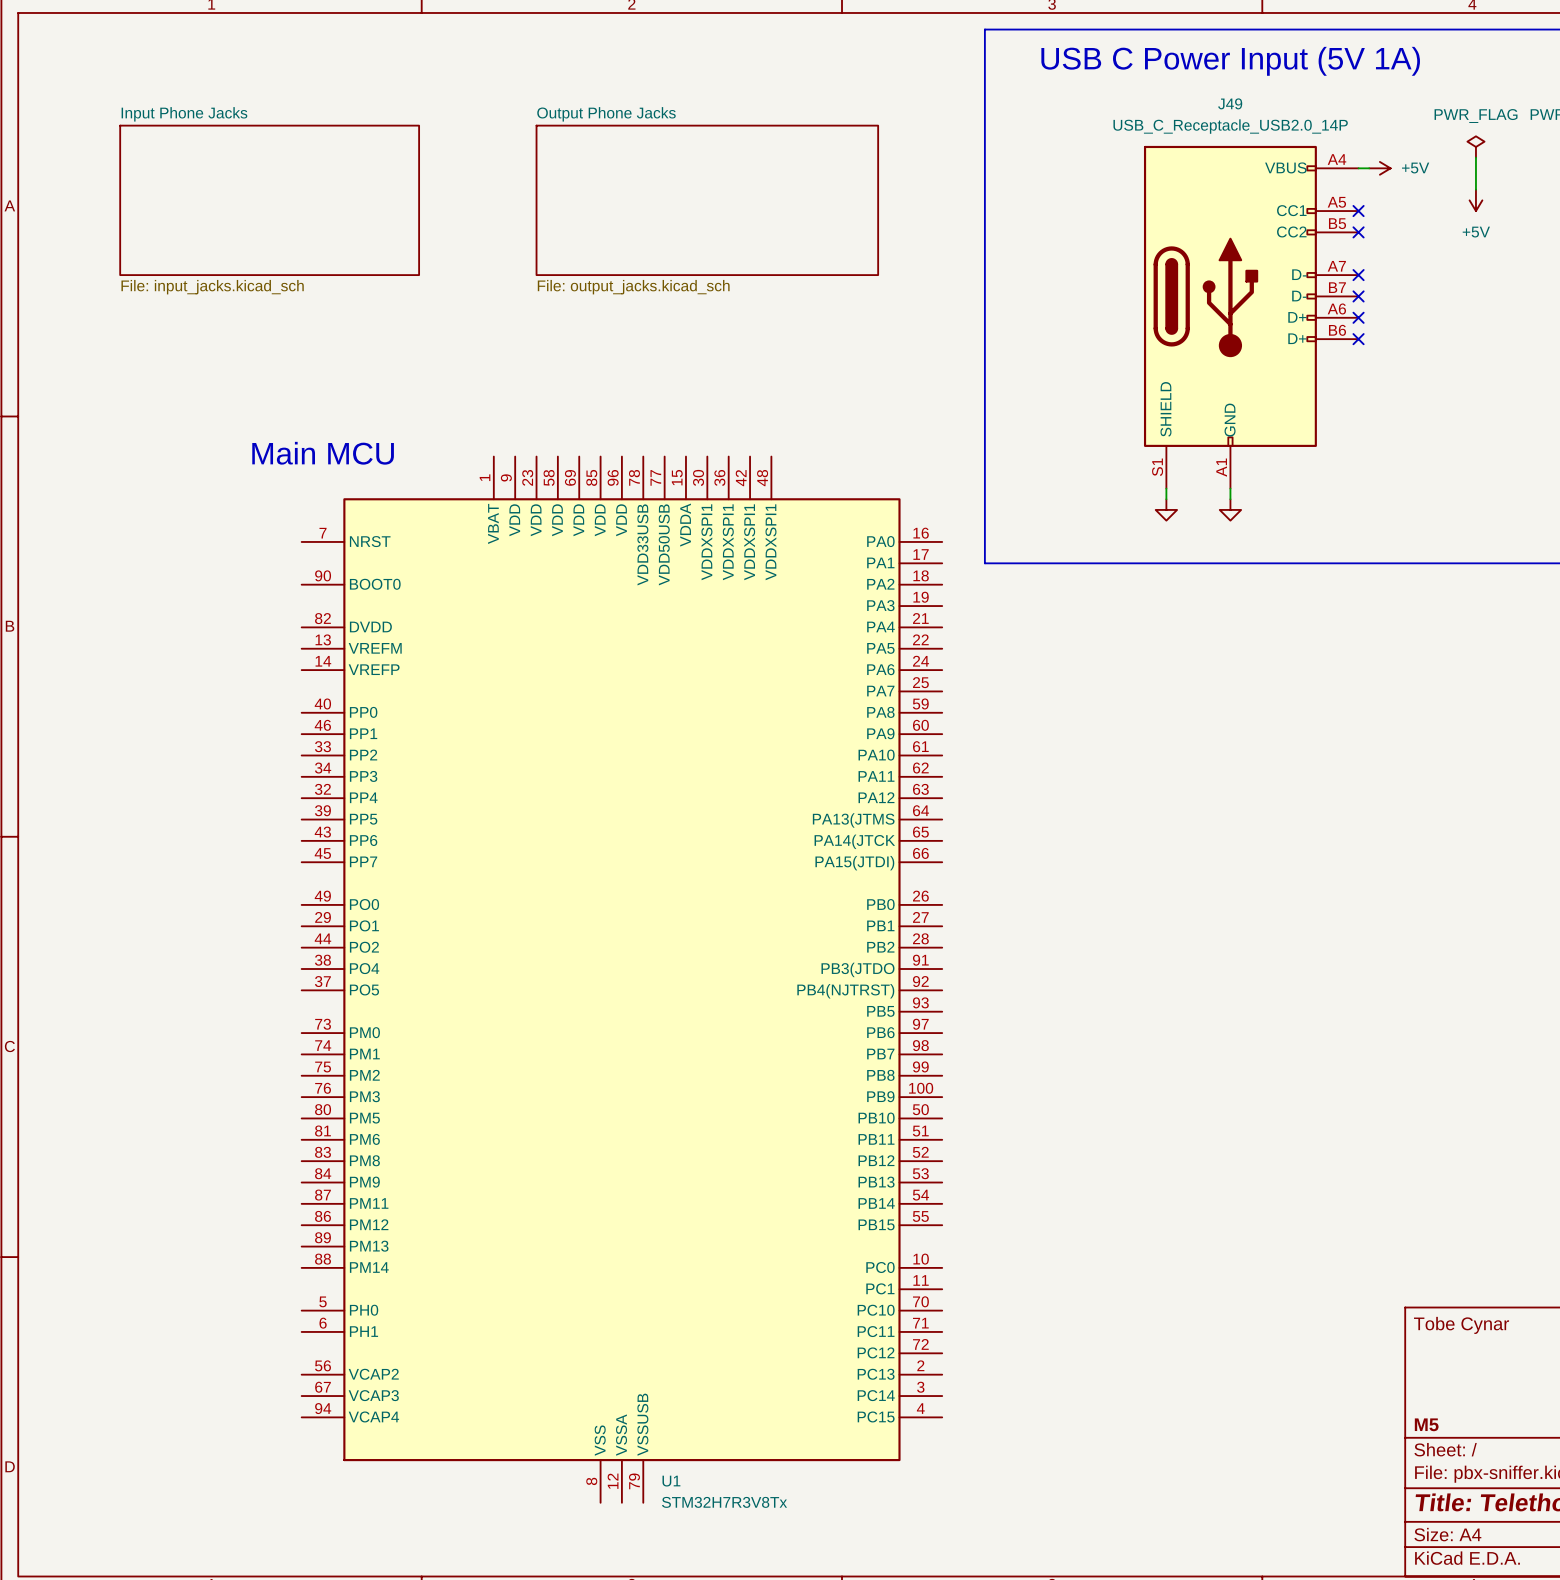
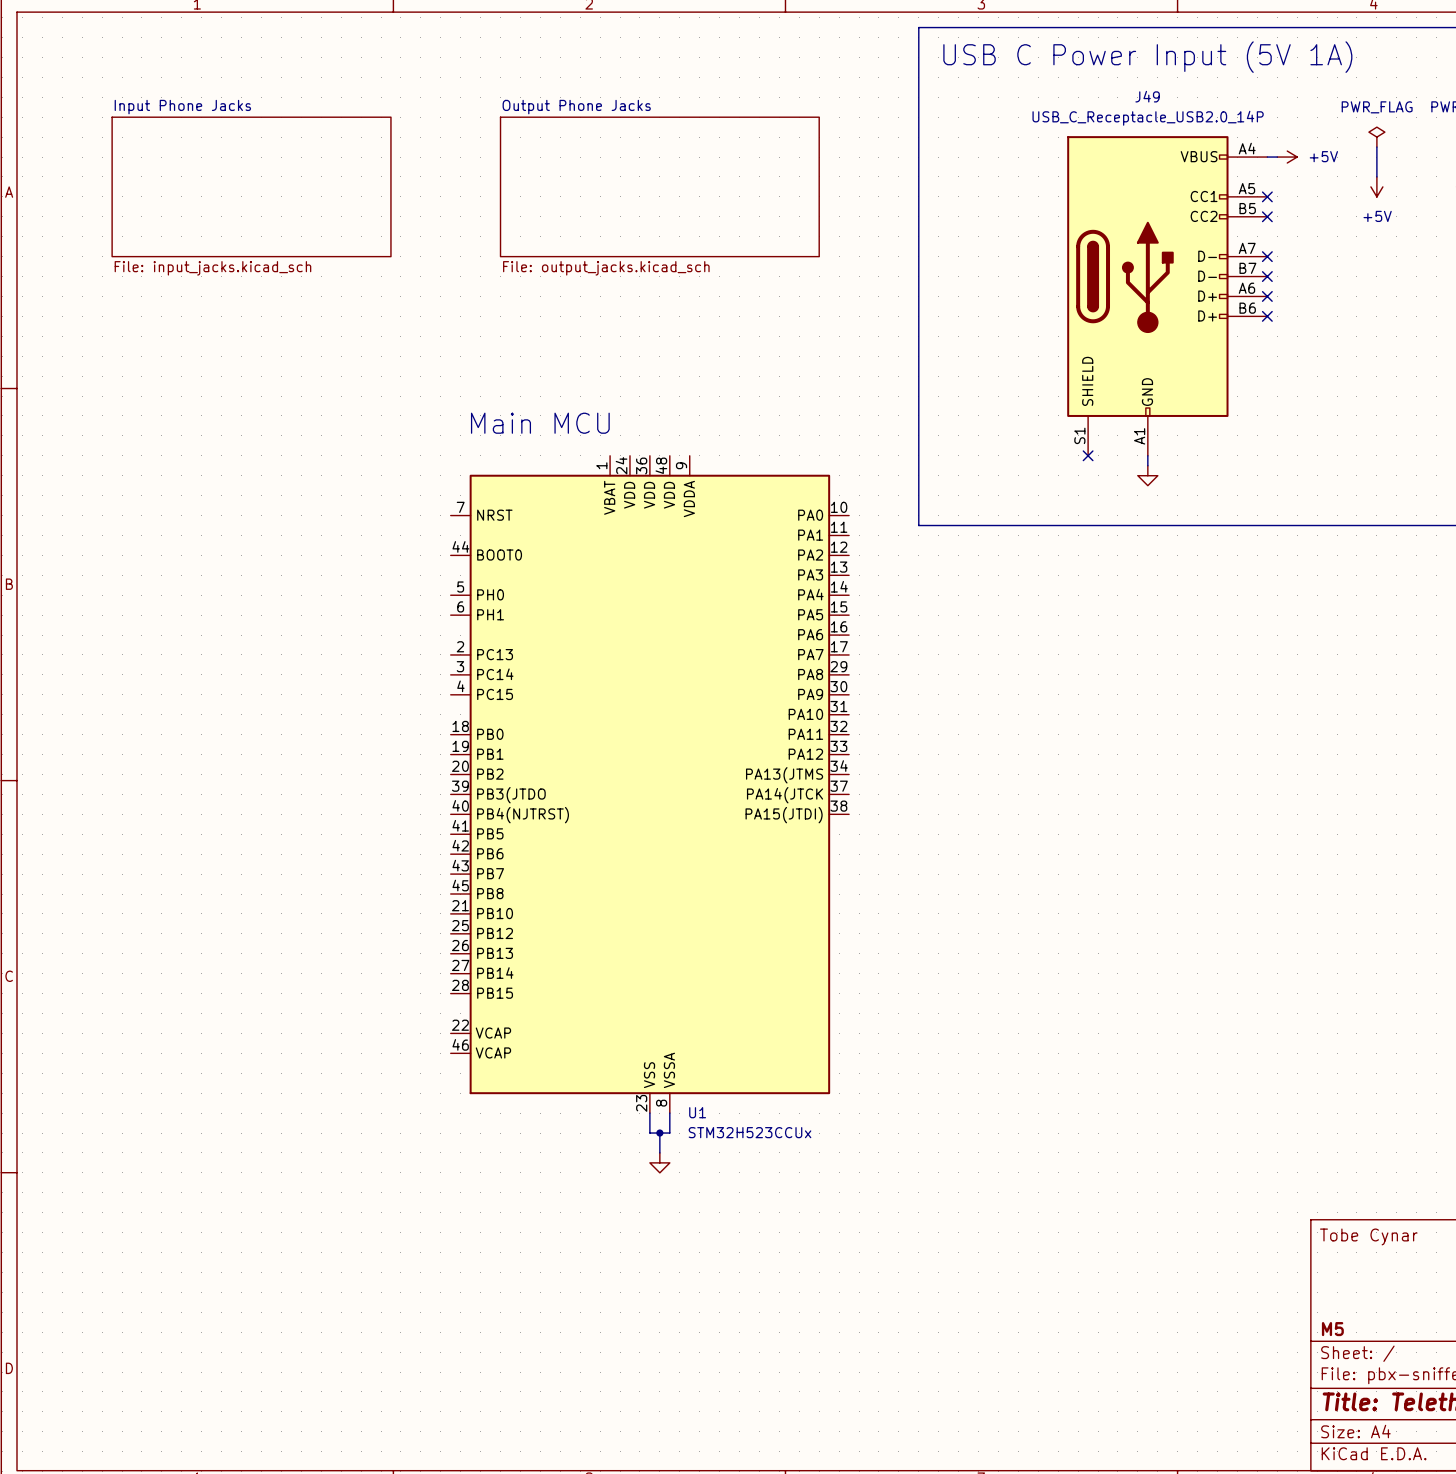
text: Main MCU (323, 453) -> none
text: none -> Main MCU (540, 423)
U1 symbol: [301, 456, 943, 1503] -> [450, 455, 850, 1114]
wire: (1166, 488) (1166, 499) -> none
no-connect mark: none -> (1088, 455)
power symbol: (1166, 509) -> none
junction: none -> (659, 1133)
power symbol: none -> (659, 1162)
U1 name position: U1 (671, 1481) -> U1 (697, 1112)
U1 value: STM32H7R3V8Tx (724, 1502) -> STM32H523CCUx (750, 1132)

